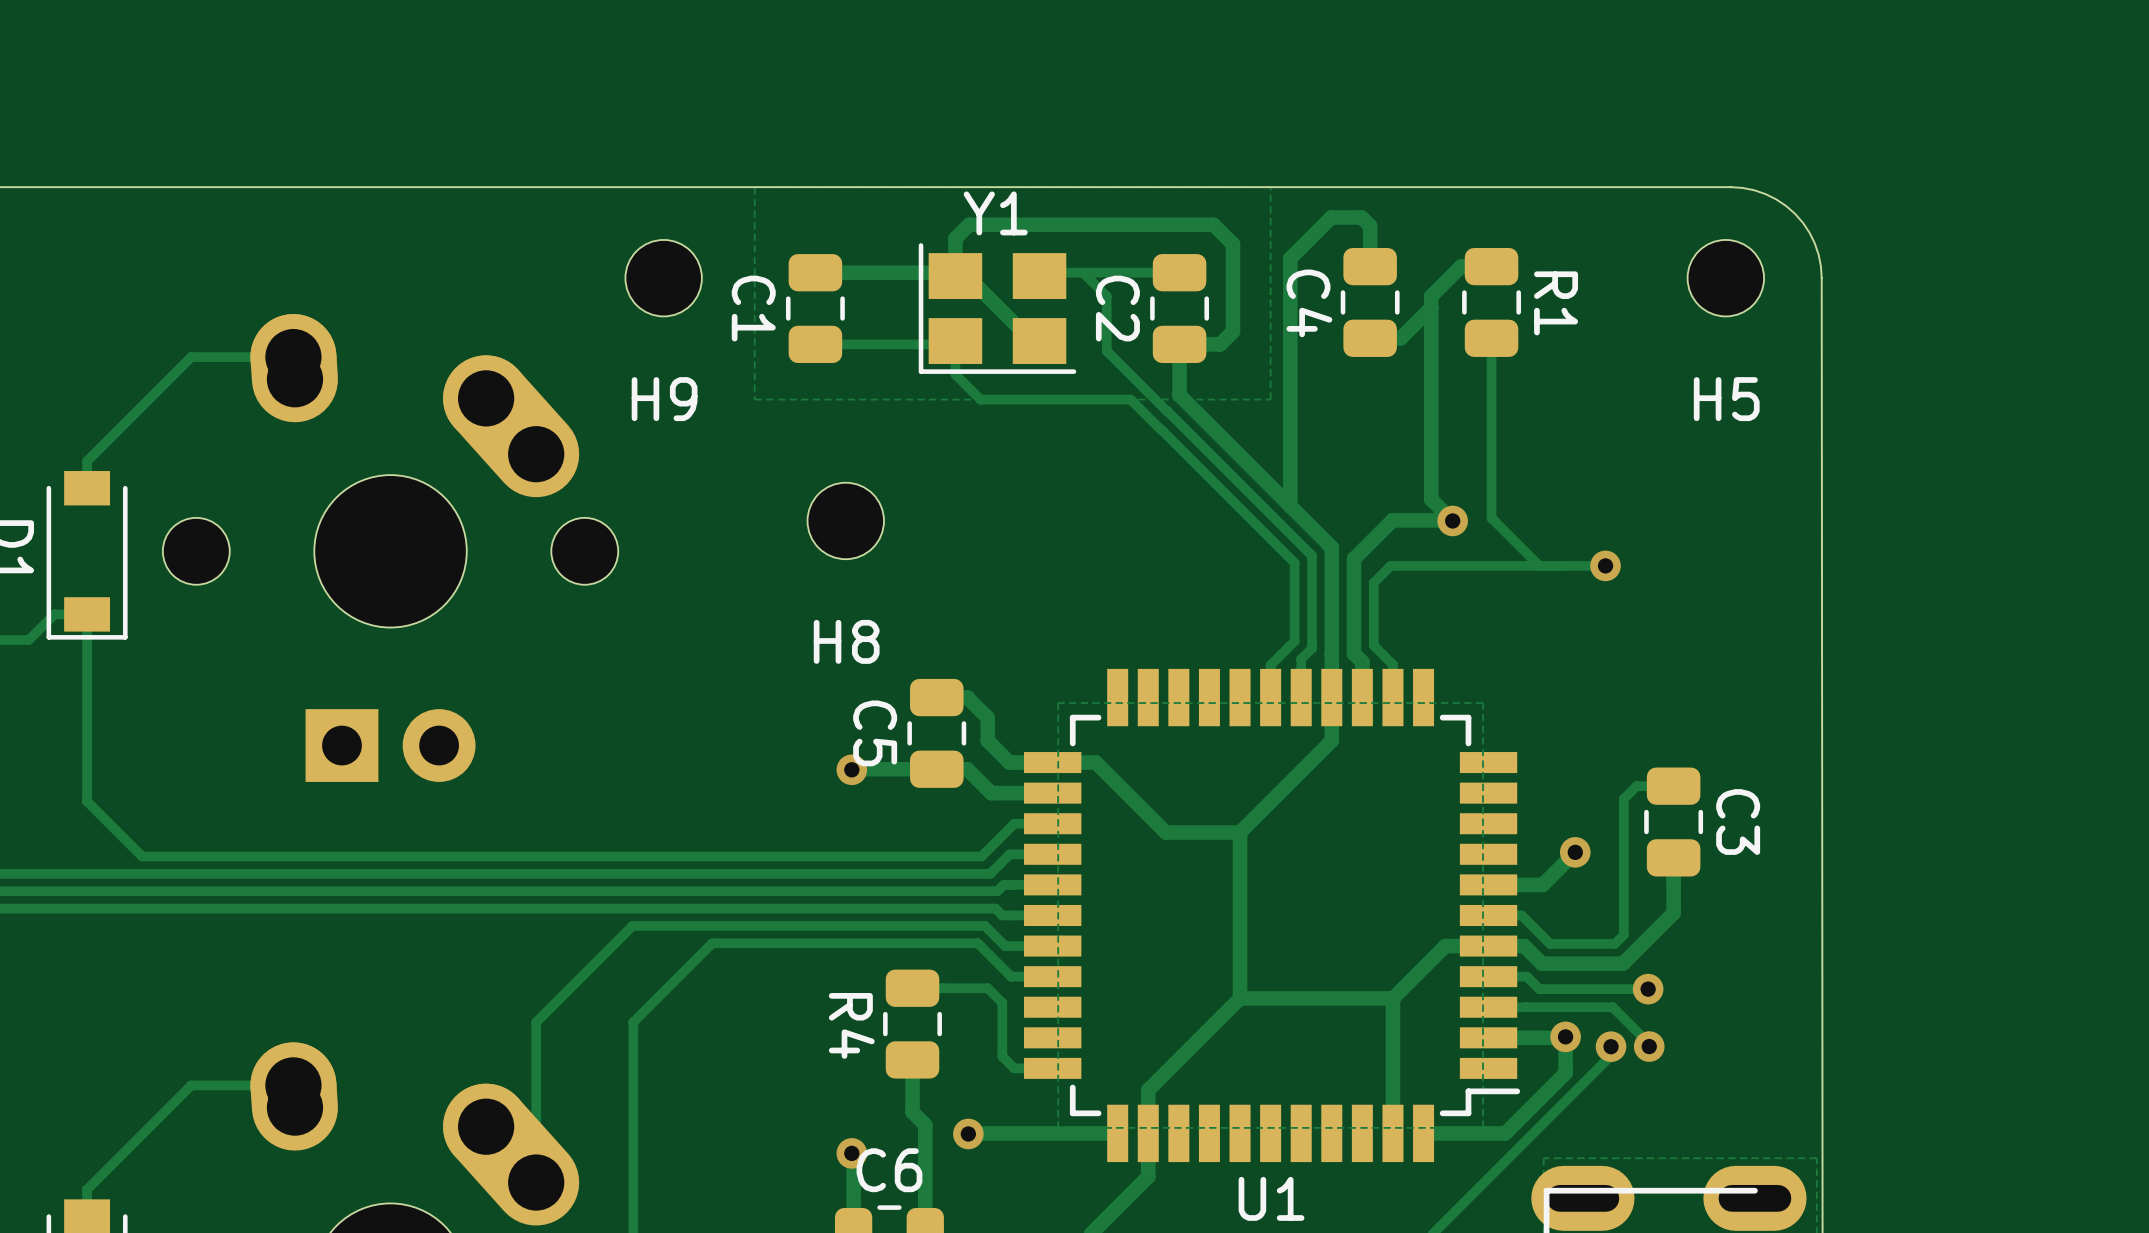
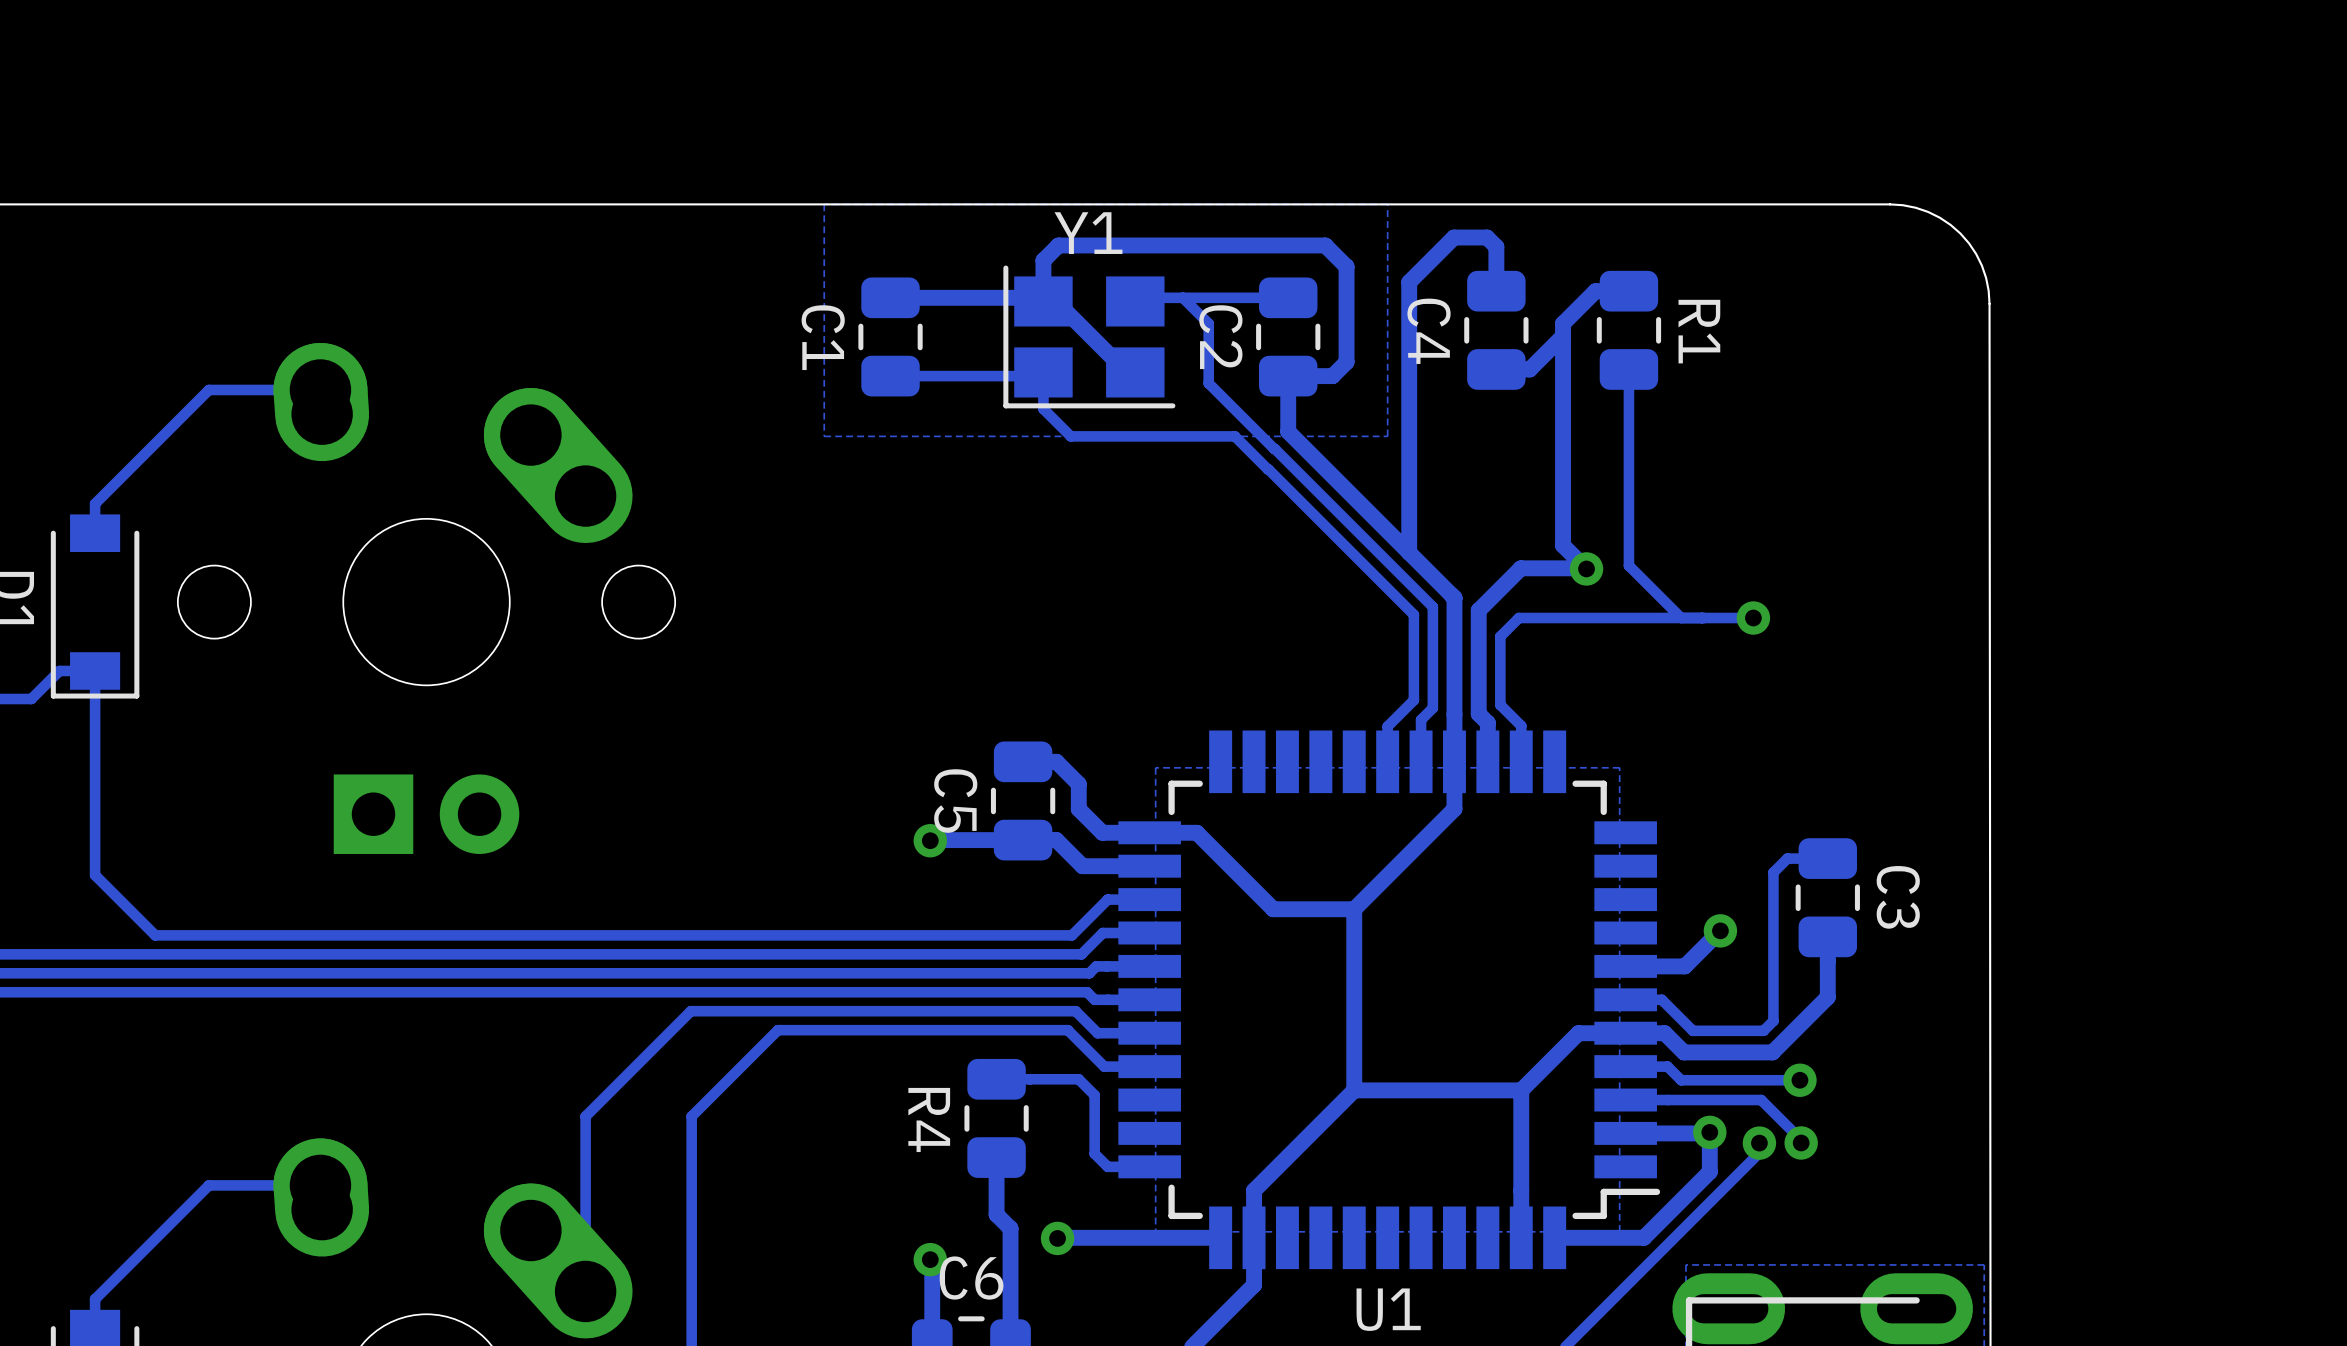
H9: (663, 278) -> none
H5: (1725, 278) -> none
H8: (845, 520) -> none

